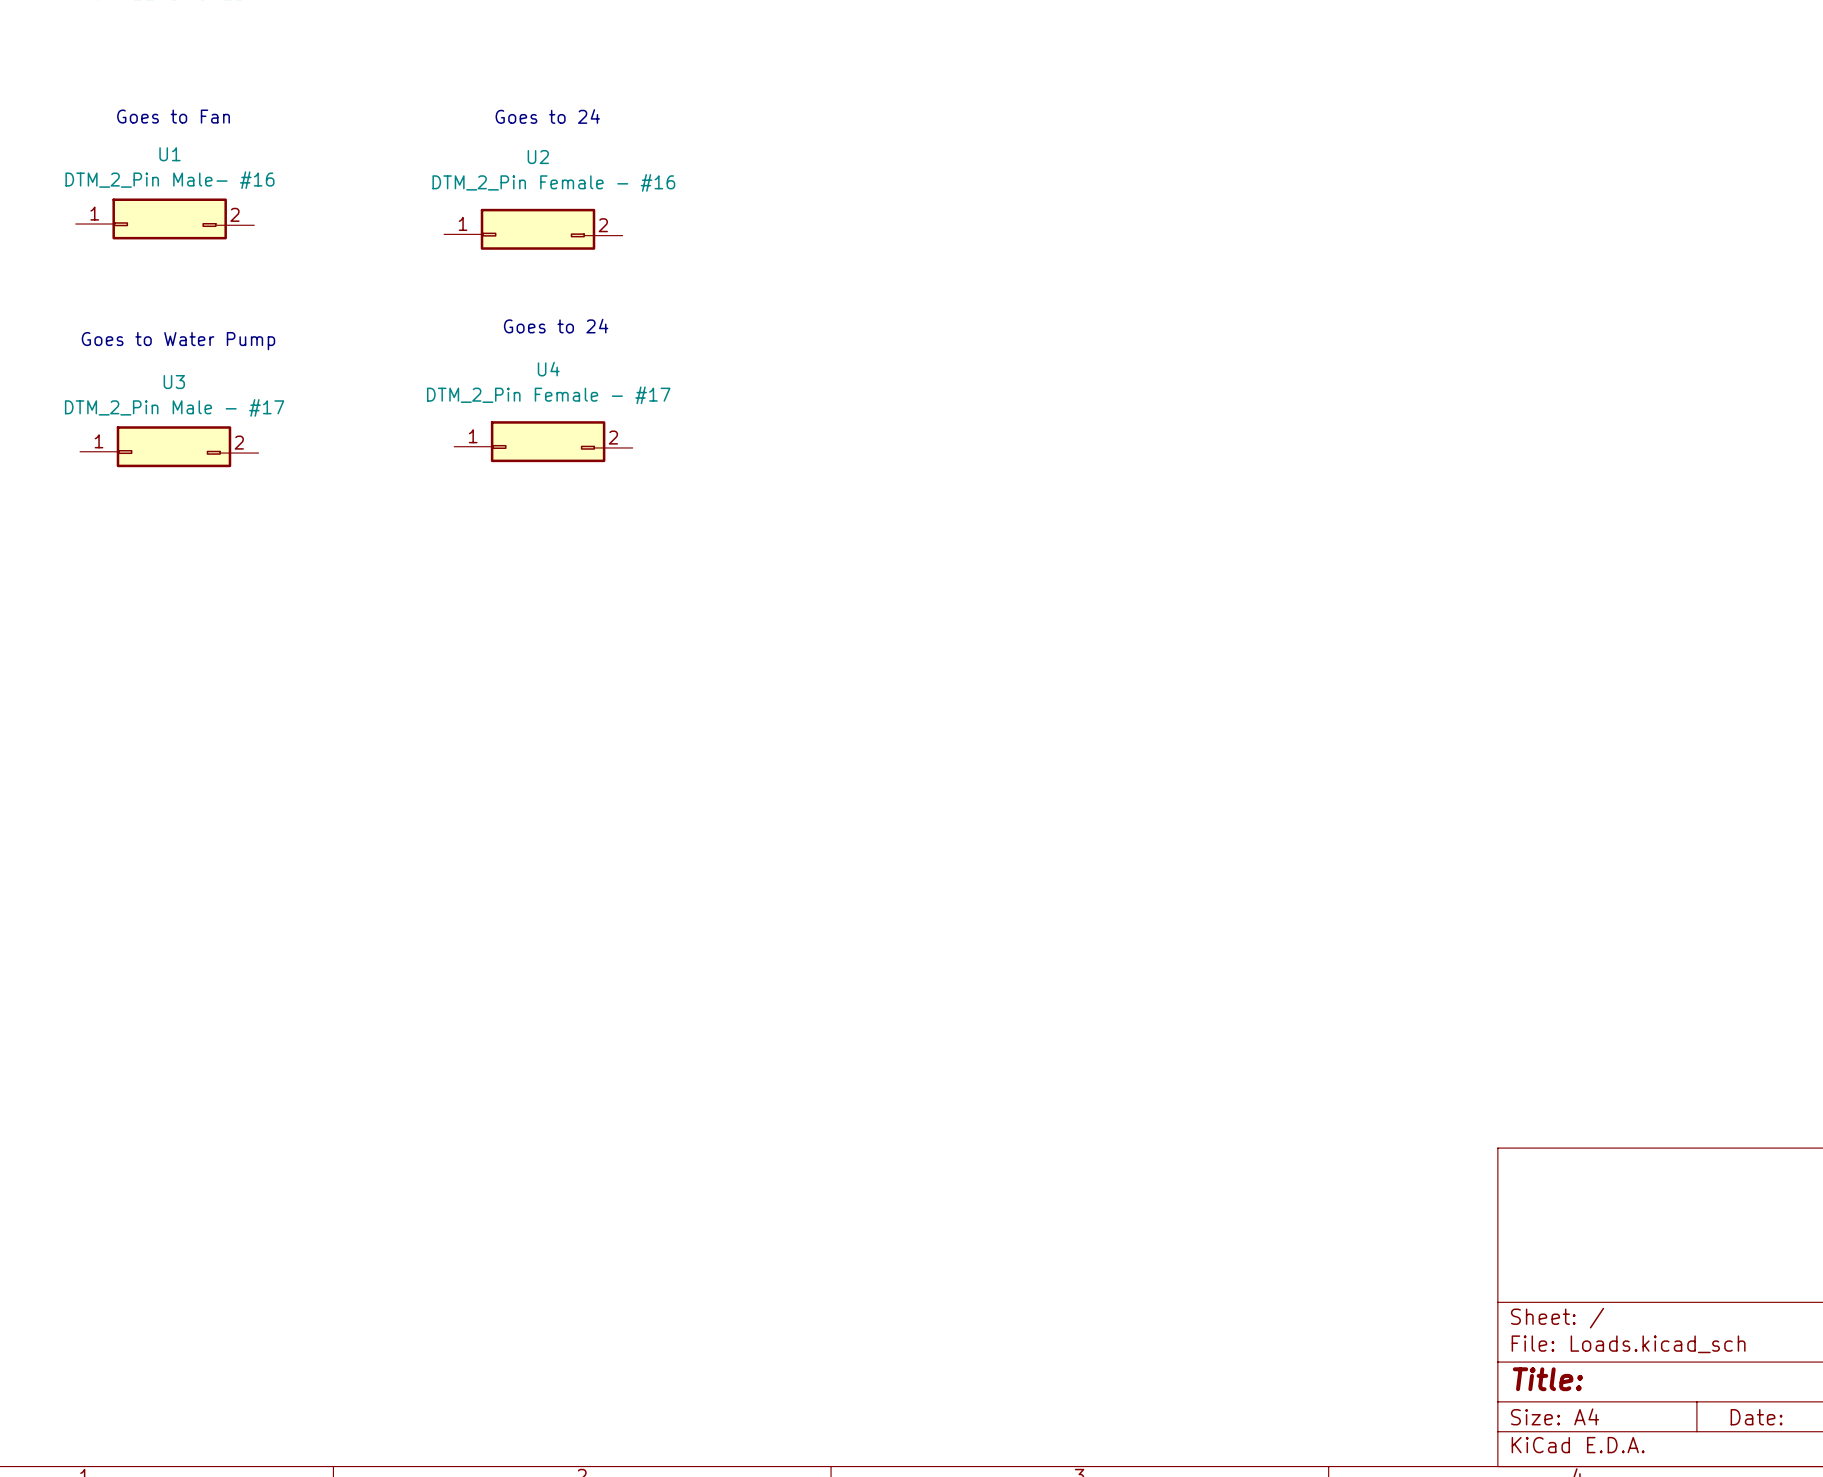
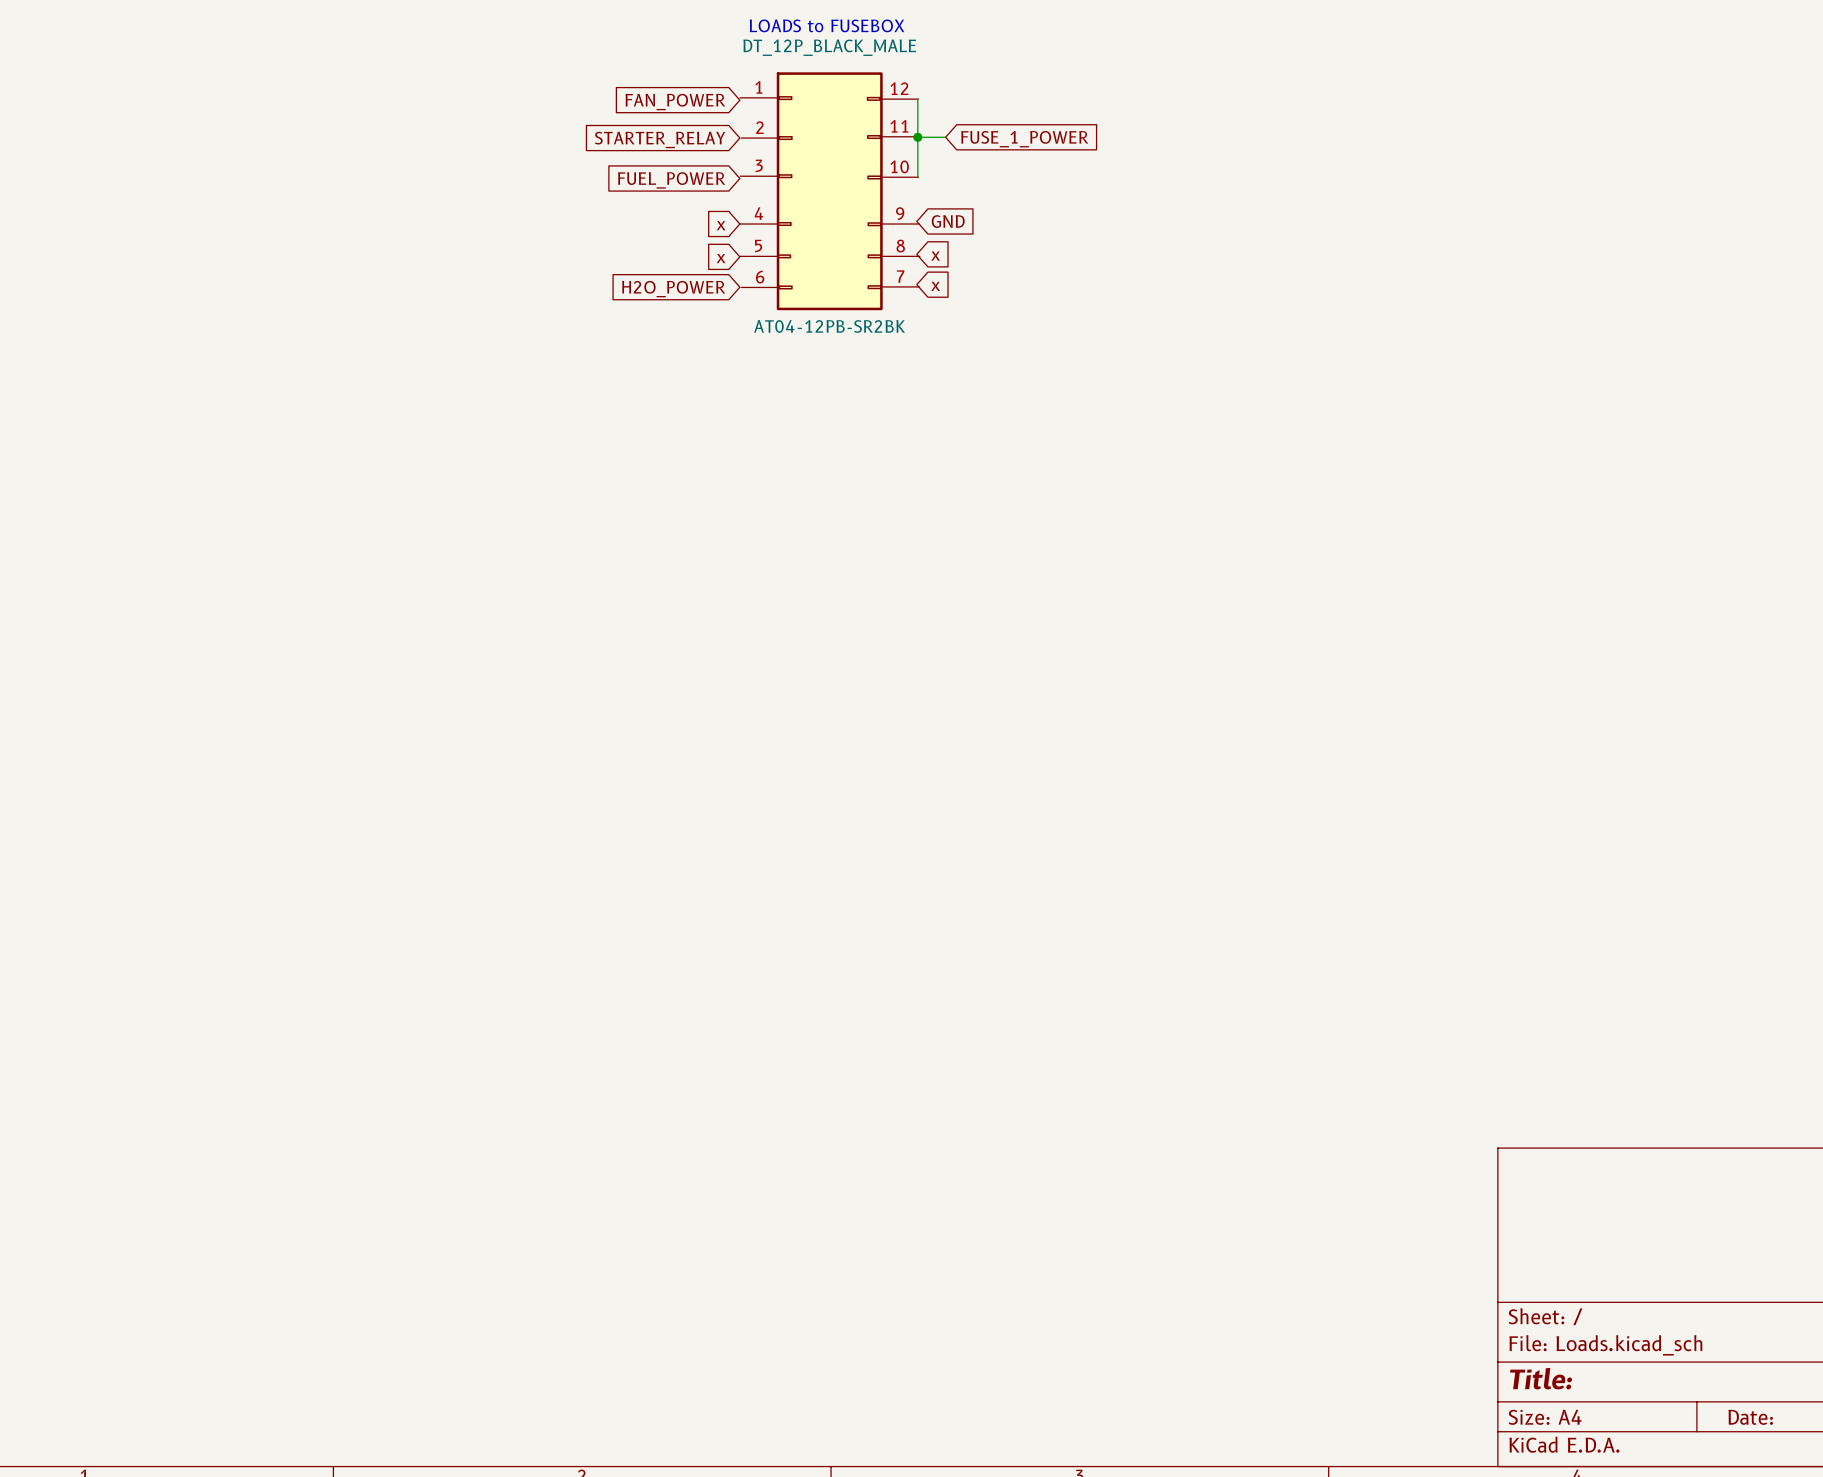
text: none -> LOADS to FUSEBOX (827, 25)
wire: none -> (917, 99) (917, 177)
global label: none -> FAN_POWER (675, 102)
text: Goes to Fan (173, 116) -> none
text: Goes to 24 (547, 116) -> none
wire: none -> (917, 137) (945, 137)
junction: none -> (917, 137)
global label: none -> FUSE_1_POWER (1024, 139)
global label: none -> STARTER_RELAY (660, 139)
global label: none -> FUEL_POWER (671, 180)
part: none -> DT_12P_BLACK_MALE (829, 191)
U1: DTM_2_Pin Male- #16 (165, 218) -> none
global label: none -> GND (948, 221)
global label: none -> x (721, 225)
U2: DTM_2_Pin Female - #16 (533, 229) -> none
global label: none -> x (935, 256)
global label: none -> x (721, 258)
global label: none -> x (935, 286)
global label: none -> H2O_POWER (673, 289)
text: Goes to 24 (556, 326) -> none
text: Goes to Water Pump (178, 341) -> none
U4: DTM_2_Pin Female - #17 (543, 441) -> none
U3: DTM_2_Pin Male - #17 (169, 446) -> none

